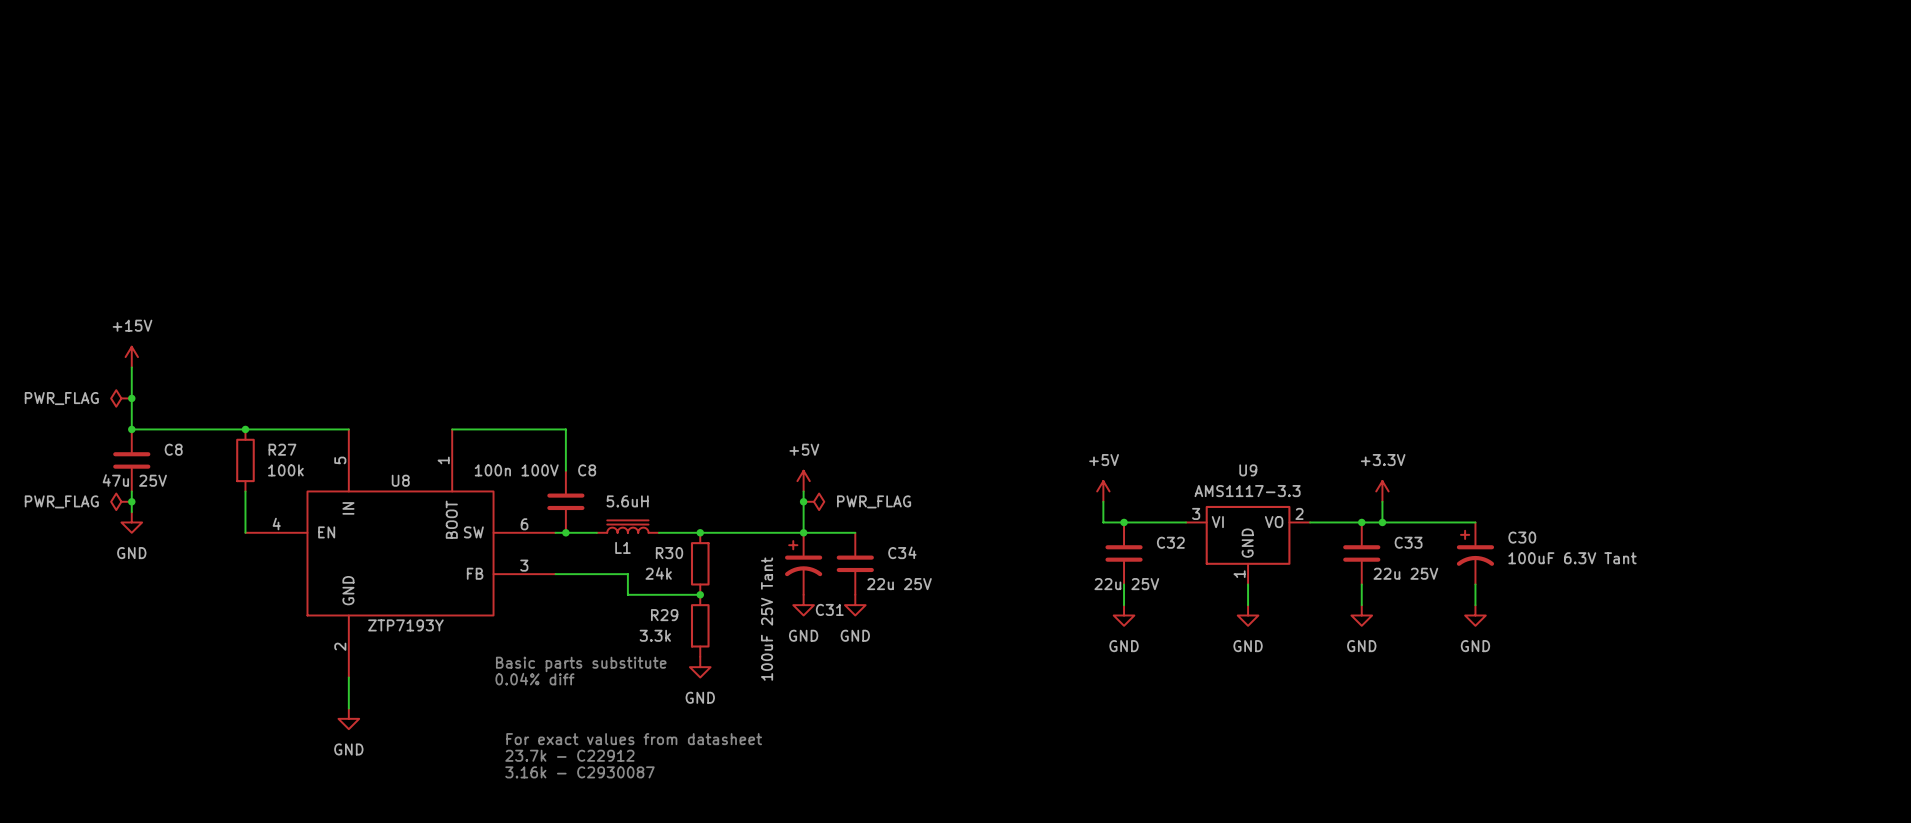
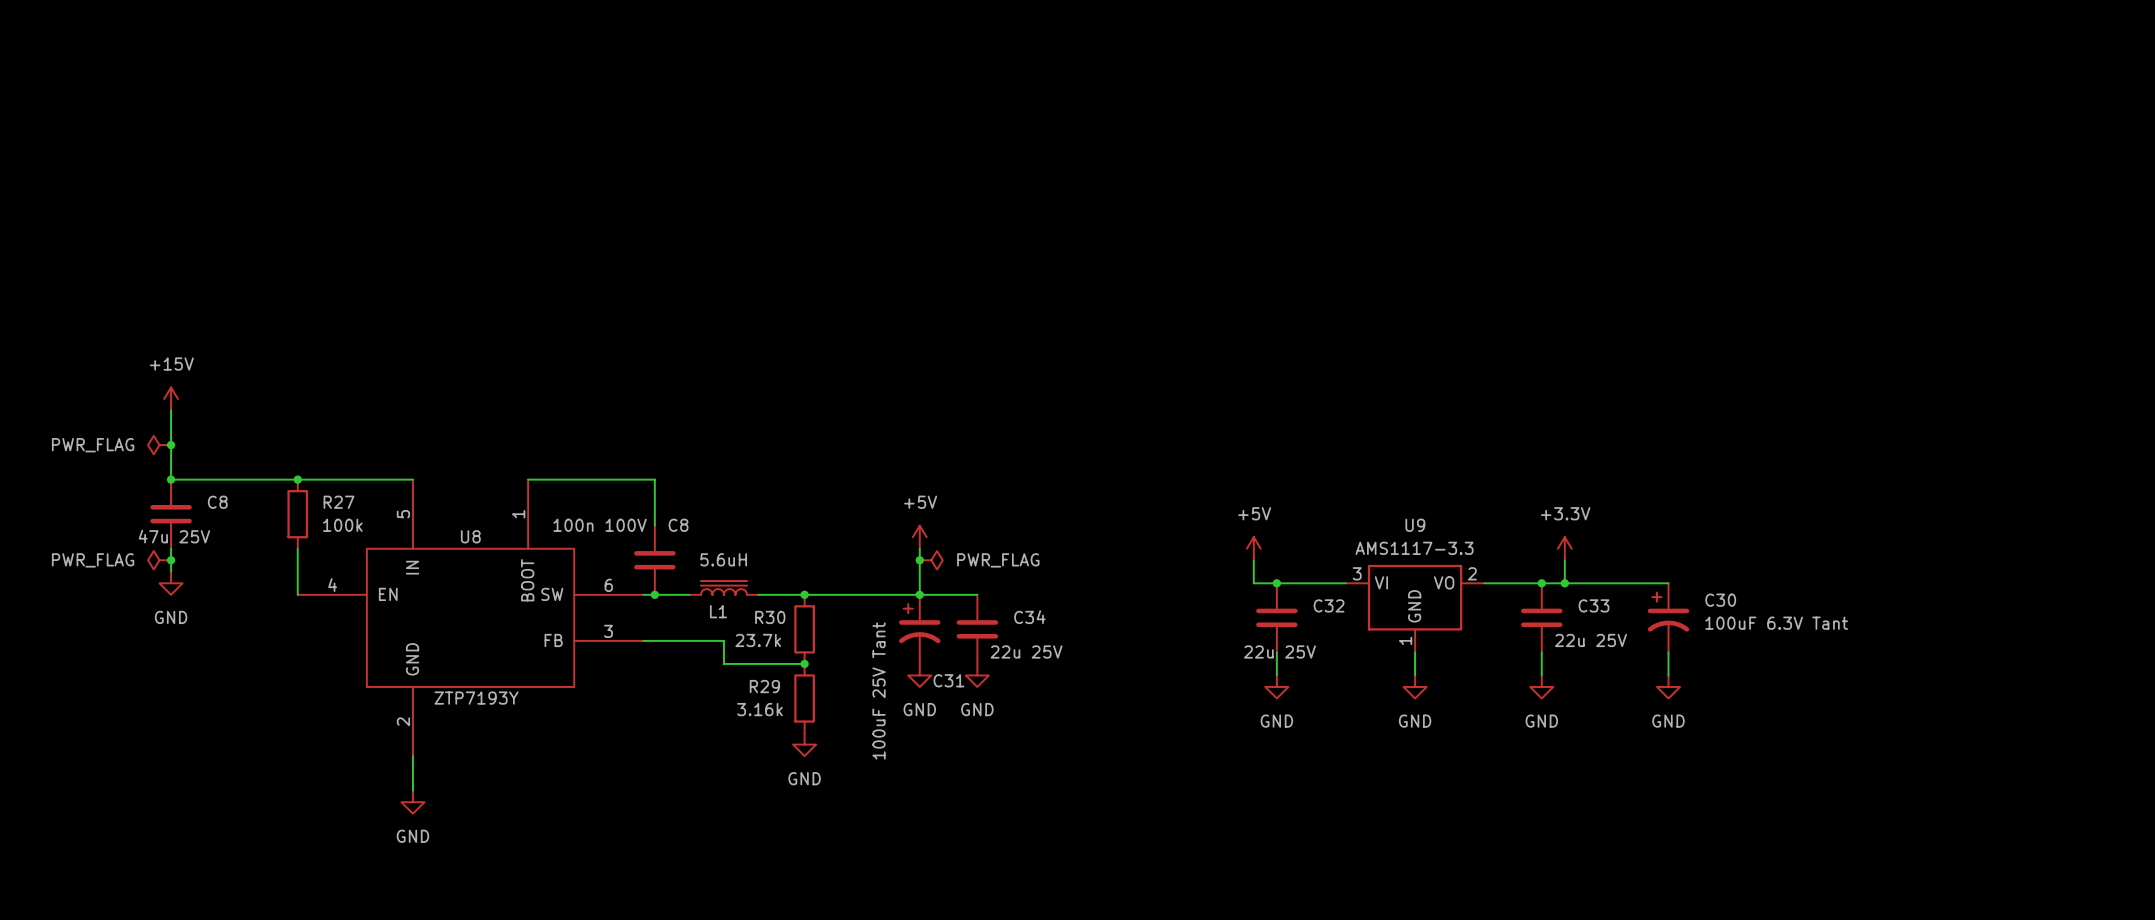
R30 value: 24k (658, 573) -> 23.7k (758, 640)
R29 value: 3.3k (655, 635) -> 3.16k (759, 709)
text: Basic parts substitute (581, 664) -> none
text: 0.04% diff (534, 679) -> none
text: For exact values from datasheet (634, 739) -> none
text: 23.7k - C22912 (569, 755) -> none
text: 3.16k - C2930087 (579, 772) -> none

